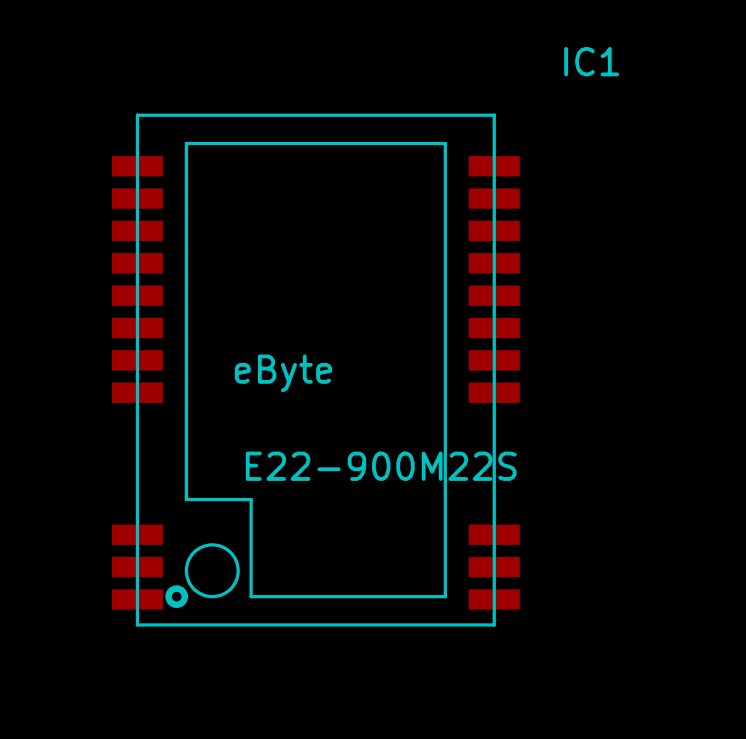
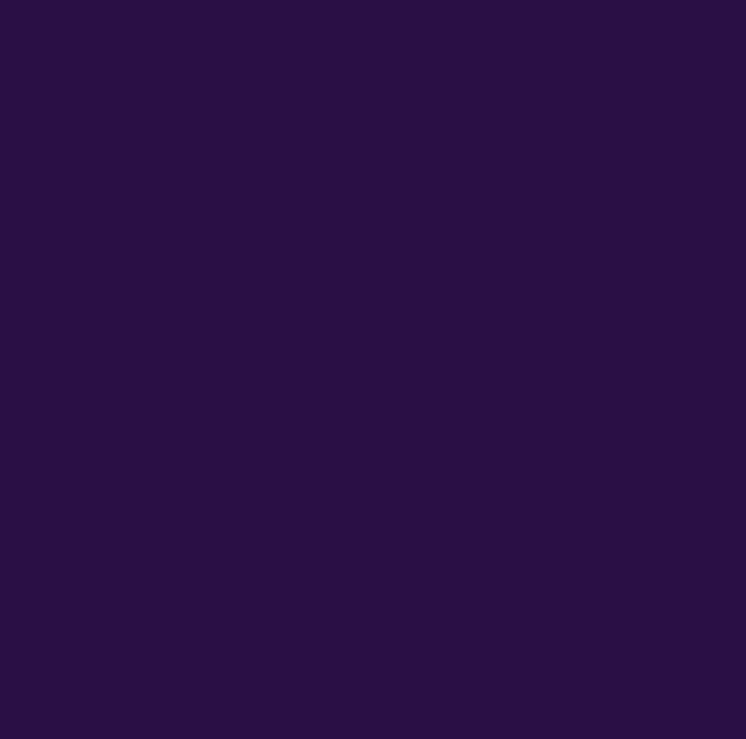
IC1: (315, 370) -> none

